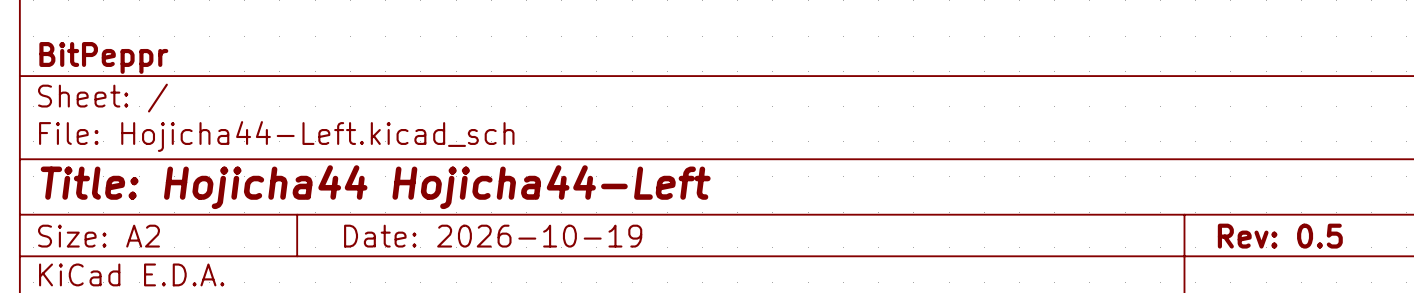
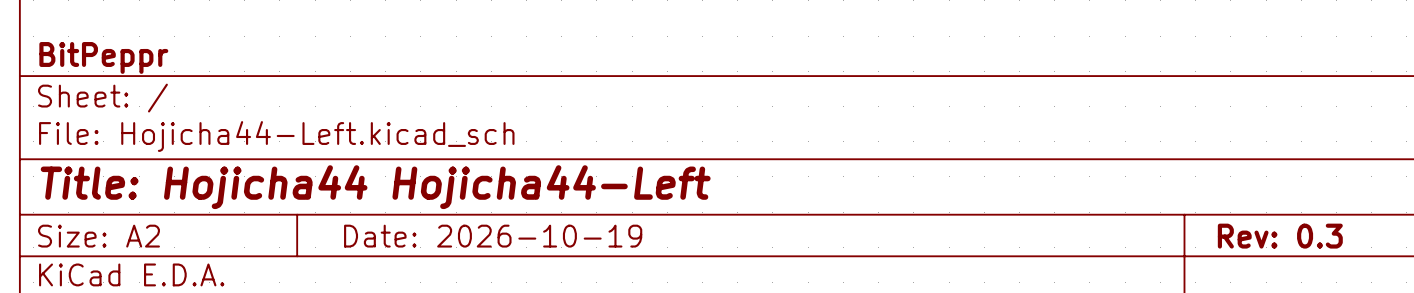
title block: Rev: 0.5 (1280, 236) -> Rev: 0.3 (1280, 236)

